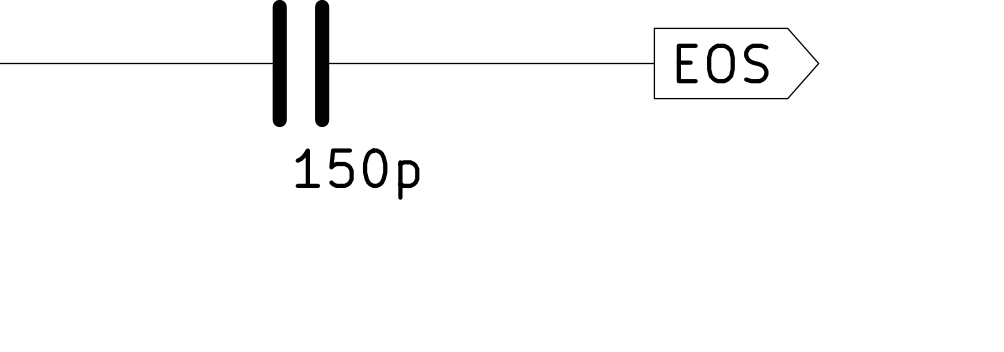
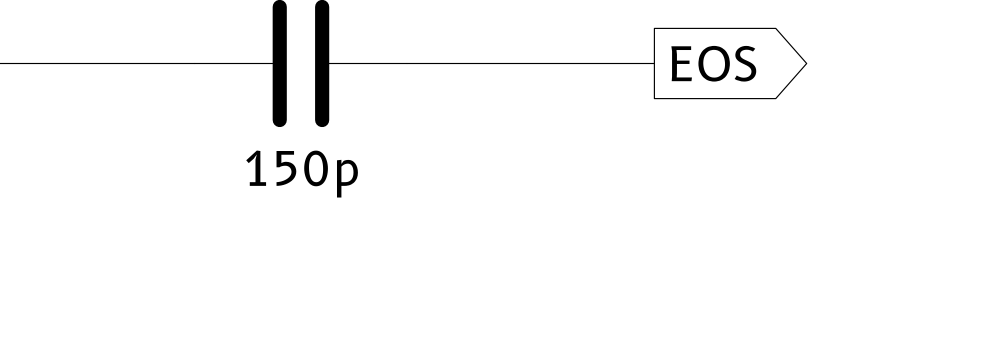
part value position: 150p (357, 174) -> 150p (302, 174)

